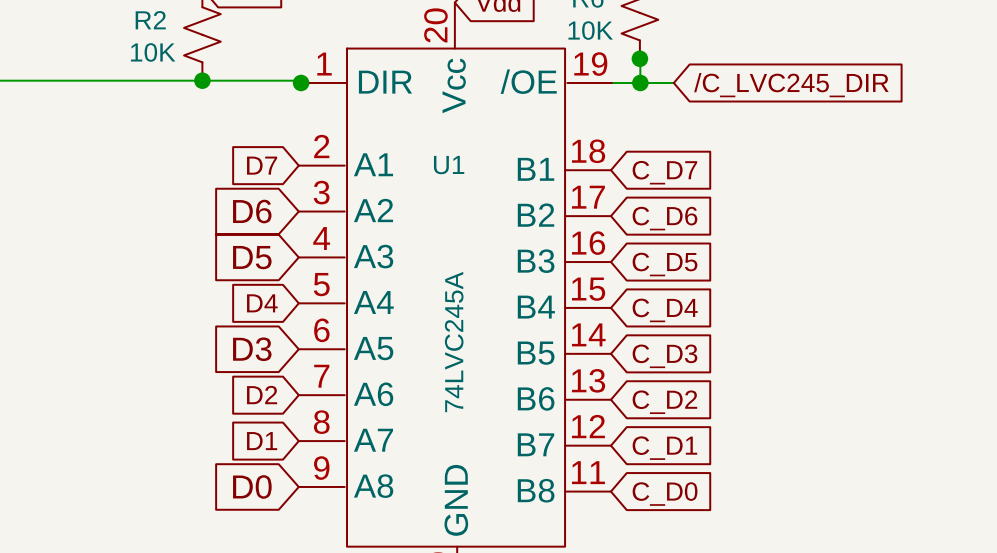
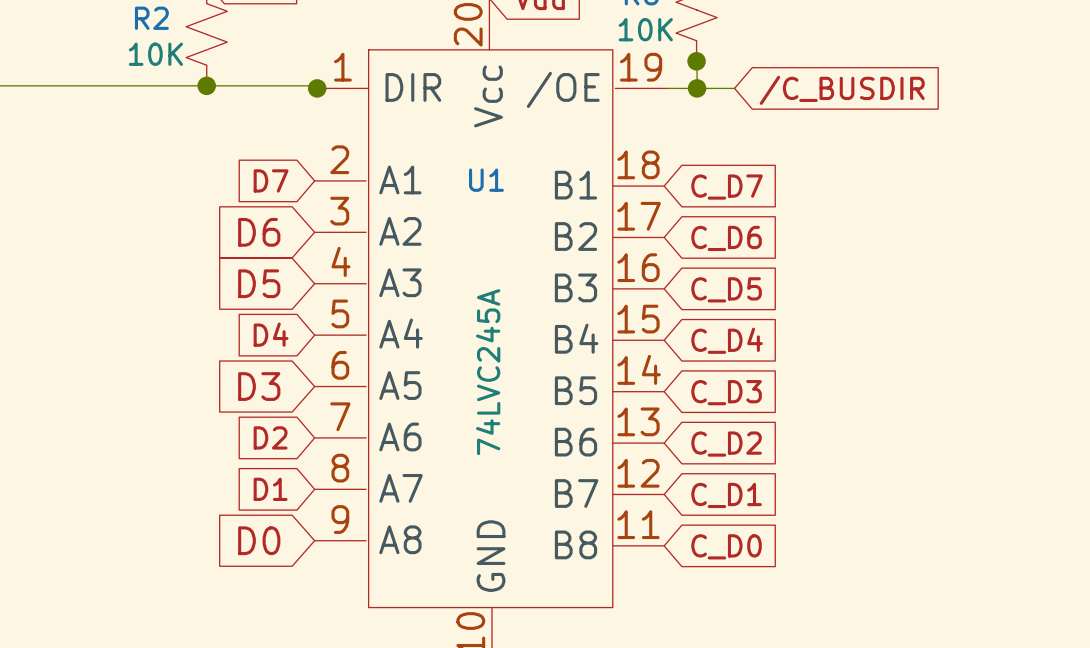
global label: /C_LVC245_DIR (791, 85) -> /C_BUSDIR (842, 90)

